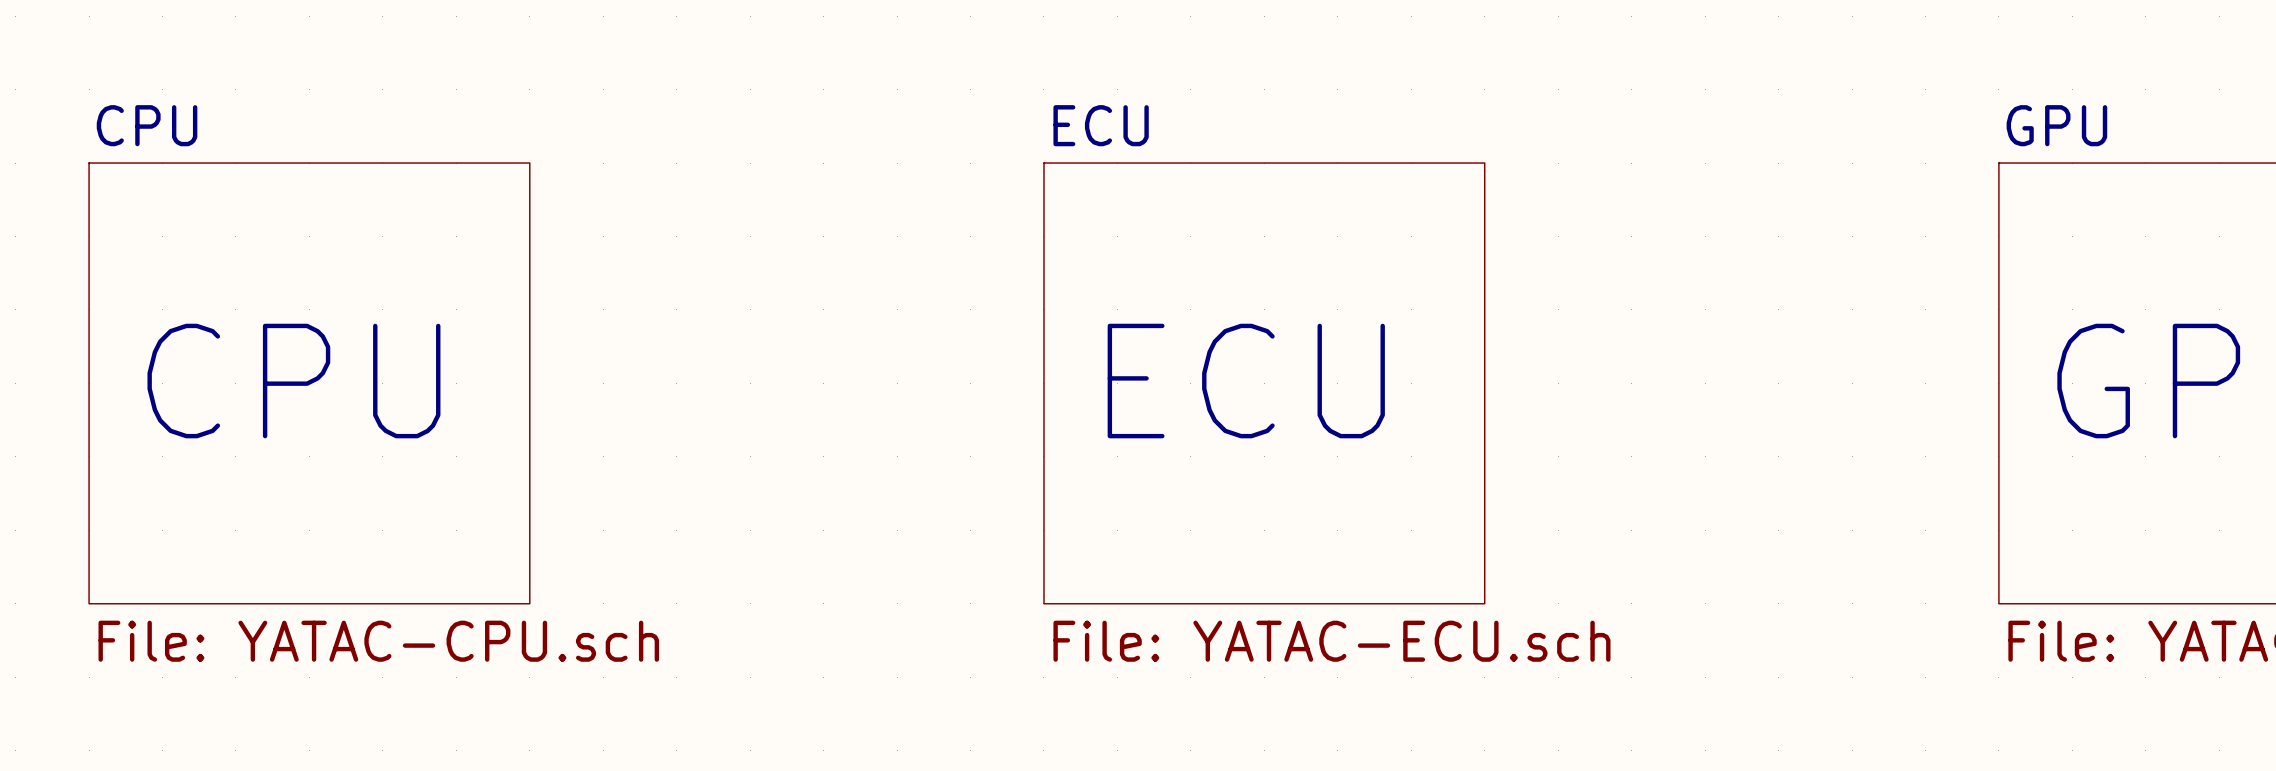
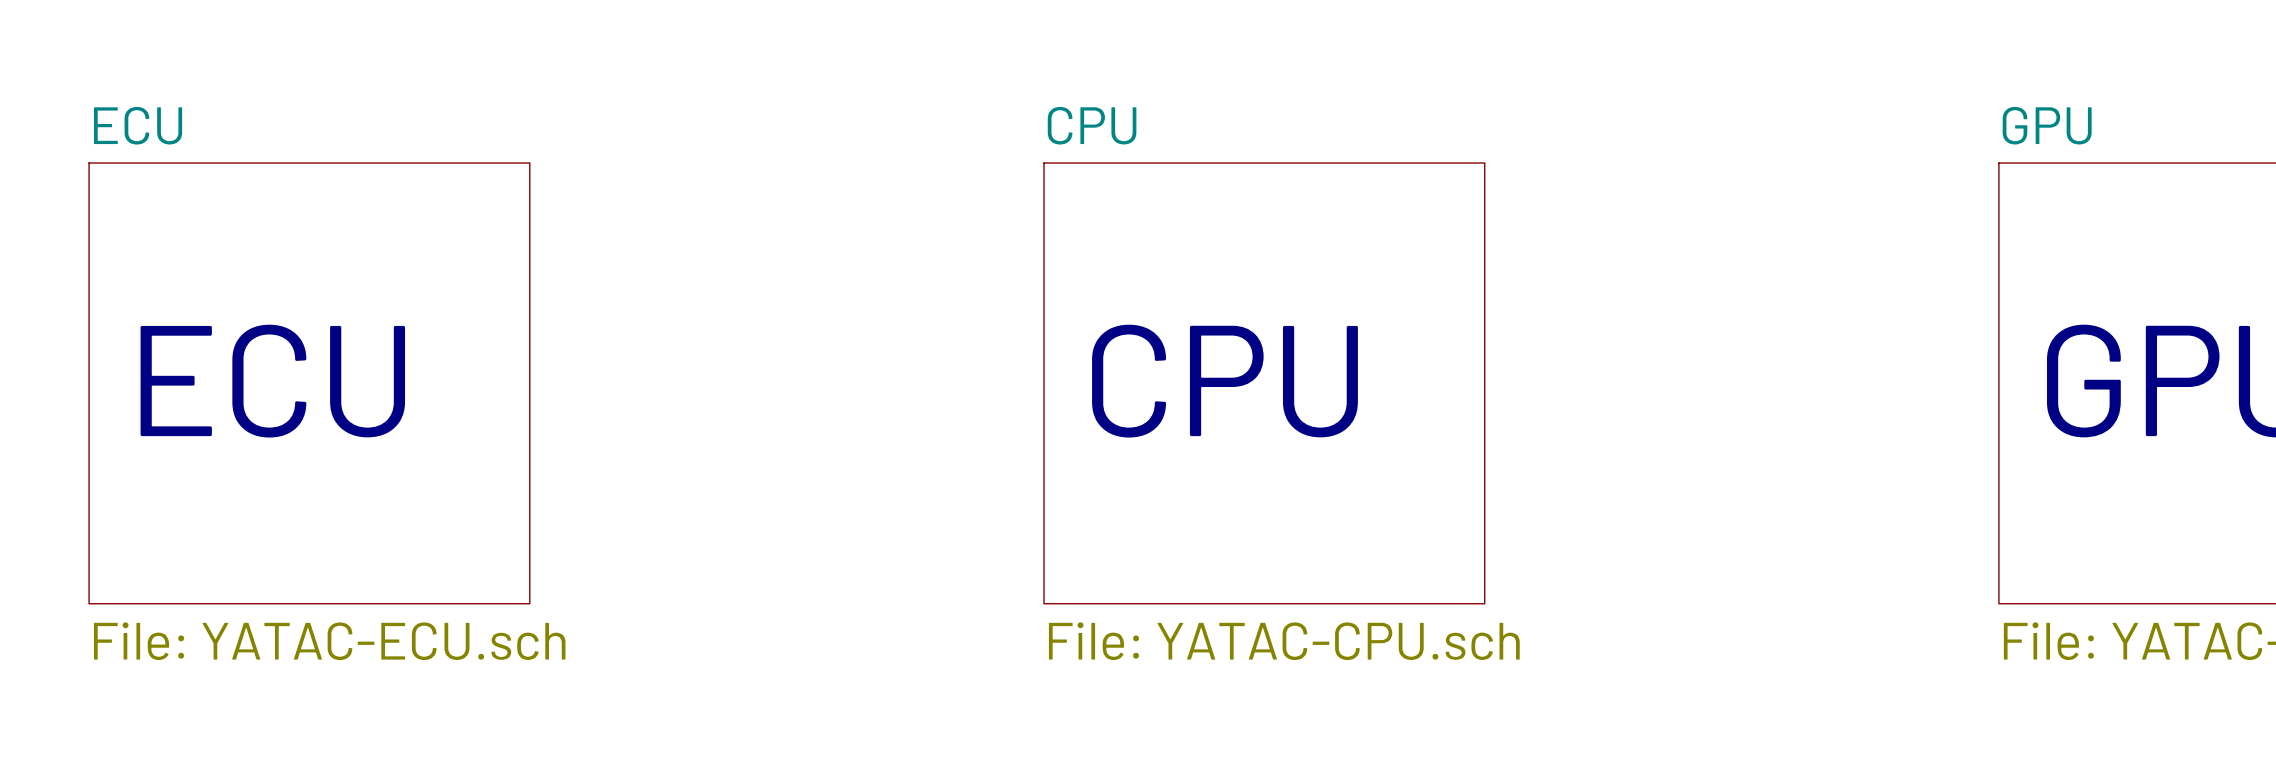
sheet CPU name: CPU (147, 125) -> ECU (138, 125)
sheet ECU name: ECU (1101, 125) -> CPU (1092, 125)
text: CPU (293, 381) -> ECU (272, 381)
text: ECU (1246, 381) -> CPU (1224, 381)
sheet CPU value: File: YATAC-CPU.sch (378, 641) -> File: YATAC-ECU.sch (329, 641)
sheet ECU value: File: YATAC-ECU.sch (1331, 641) -> File: YATAC-CPU.sch (1284, 641)

